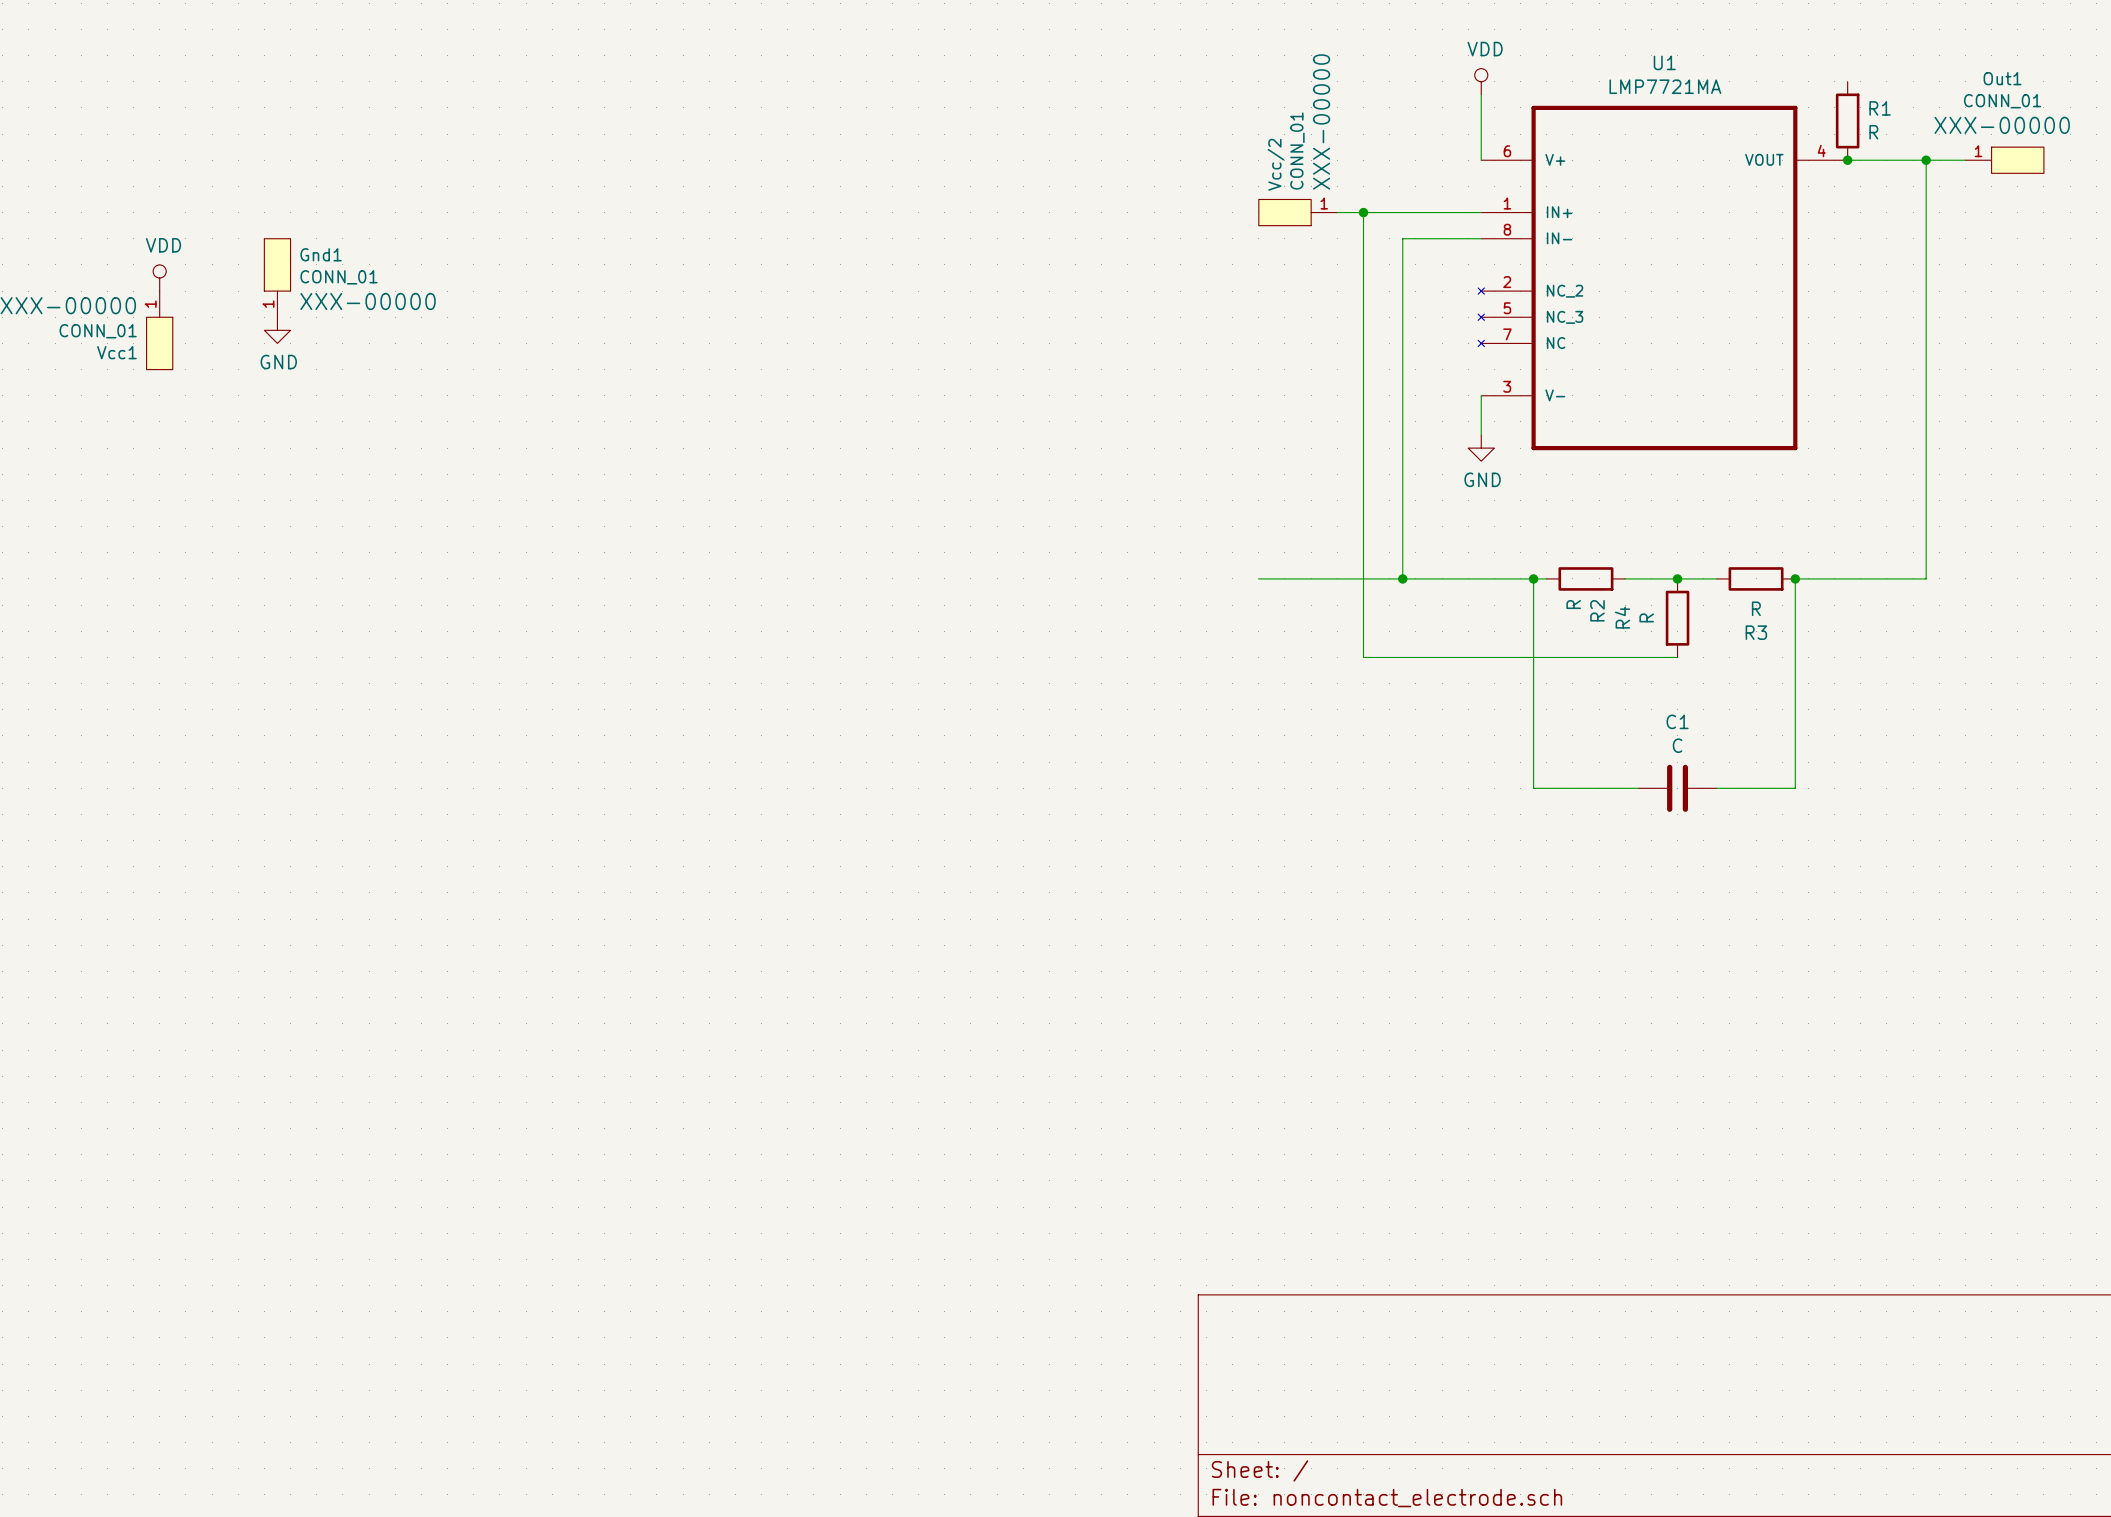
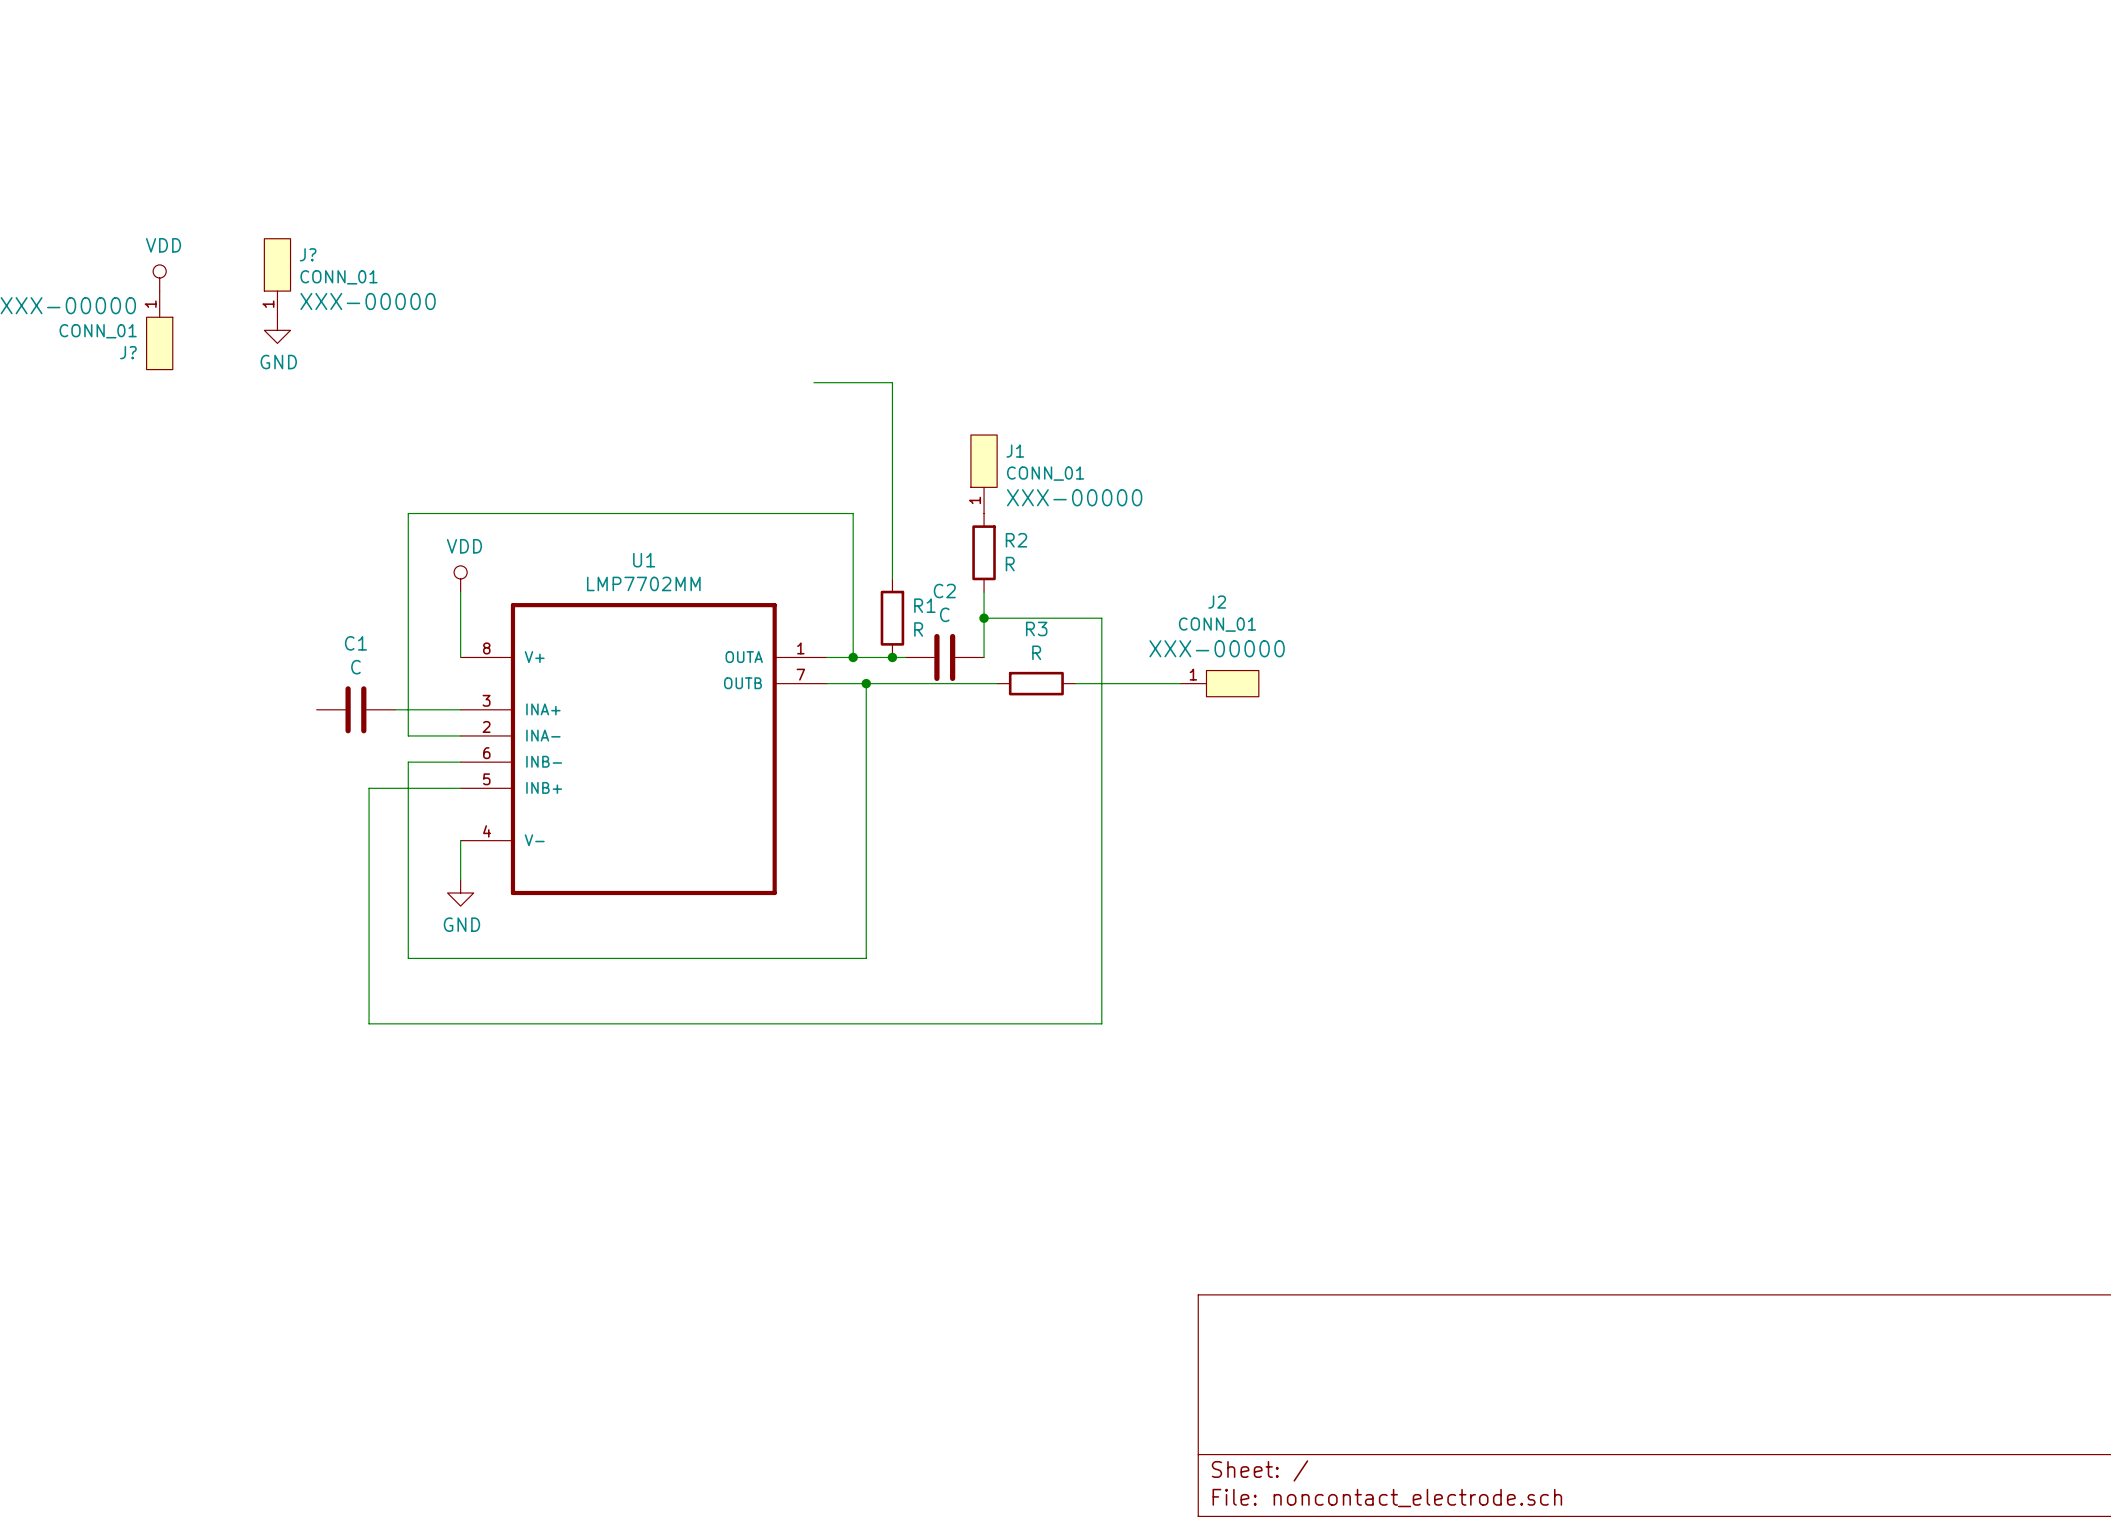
U1 name position: U1 (1664, 62) -> U1 (644, 560)
power symbol: VDD (1481, 81) -> none
U1 value: LMP7721MA (1665, 86) -> LMP7702MM (643, 583)
wire: (1481, 94) (1481, 160) -> none
U1 symbol: [1478, 105, 1848, 451] -> [460, 603, 828, 896]
R1 position: (1847, 120) -> (892, 618)
wire: (1847, 160) (1965, 160) -> none
junction: (1847, 160) -> none
wire: (1926, 160) (1926, 578) (1795, 578) (1795, 788) (1716, 788) -> none
junction: (1926, 160) -> none
Out1: CONN_01 (2004, 160) -> none
Vcc/2: CONN_01 (1298, 212) -> none
wire: (1337, 212) (1481, 212) -> none
wire: (1363, 212) (1363, 657) (1677, 657) -> none
junction: (1363, 212) -> none
wire: (1481, 238) (1402, 238) (1402, 578) -> none
Gnd1 name: Gnd1 (321, 254) -> J? (308, 254)
Vcc1 name: Vcc1 (116, 352) -> J? (128, 352)
wire: none -> (813, 382) (892, 382) (892, 578)
wire: (1481, 395) (1481, 435) -> none
power symbol: GND (1481, 448) -> none
J1: none -> CONN_01 (984, 474)
power symbol: none -> VDD (460, 578)
wire: (1258, 578) (1546, 578) -> none
junction: (1402, 578) -> none
wire: (1533, 578) (1533, 788) (1638, 788) -> none
junction: (1533, 578) -> none
R2 rotation: 0° (1585, 578) -> 90° clockwise (984, 552)
R2 position: (1585, 578) -> (984, 552)
wire: (1625, 578) (1716, 578) -> none
junction: (1677, 578) -> none
R3 position: (1756, 578) -> (1036, 683)
junction: (1795, 578) -> none
wire: none -> (460, 592) (460, 657)
wire: none -> (984, 592) (984, 657)
R2 value position: R (1573, 604) -> R (1010, 564)
R3 value position: R (1756, 608) -> R (1036, 652)
R2 name position: R2 (1597, 610) -> R2 (1016, 540)
wire: none -> (984, 618) (1101, 618) (1101, 1023) (369, 1023) (369, 788) (460, 788)
junction: none -> (984, 618)
R4: R (1677, 618) -> none
R3 name position: R3 (1756, 632) -> R3 (1036, 628)
wire: none -> (827, 657) (905, 657)
wire: none -> (853, 657) (853, 513) (408, 513) (408, 735) (460, 735)
junction: none -> (853, 657)
junction: none -> (892, 657)
C2: none -> C (944, 657)
wire: none -> (827, 683) (997, 683)
wire: none -> (866, 683) (866, 958) (408, 958) (408, 762) (460, 762)
junction: none -> (866, 683)
wire: none -> (1075, 683) (1180, 683)
J2: none -> CONN_01 (1219, 683)
wire: none -> (395, 709) (460, 709)
C1 position: (1677, 788) -> (355, 709)
wire: none -> (460, 840) (460, 879)
power symbol: none -> GND (460, 892)

